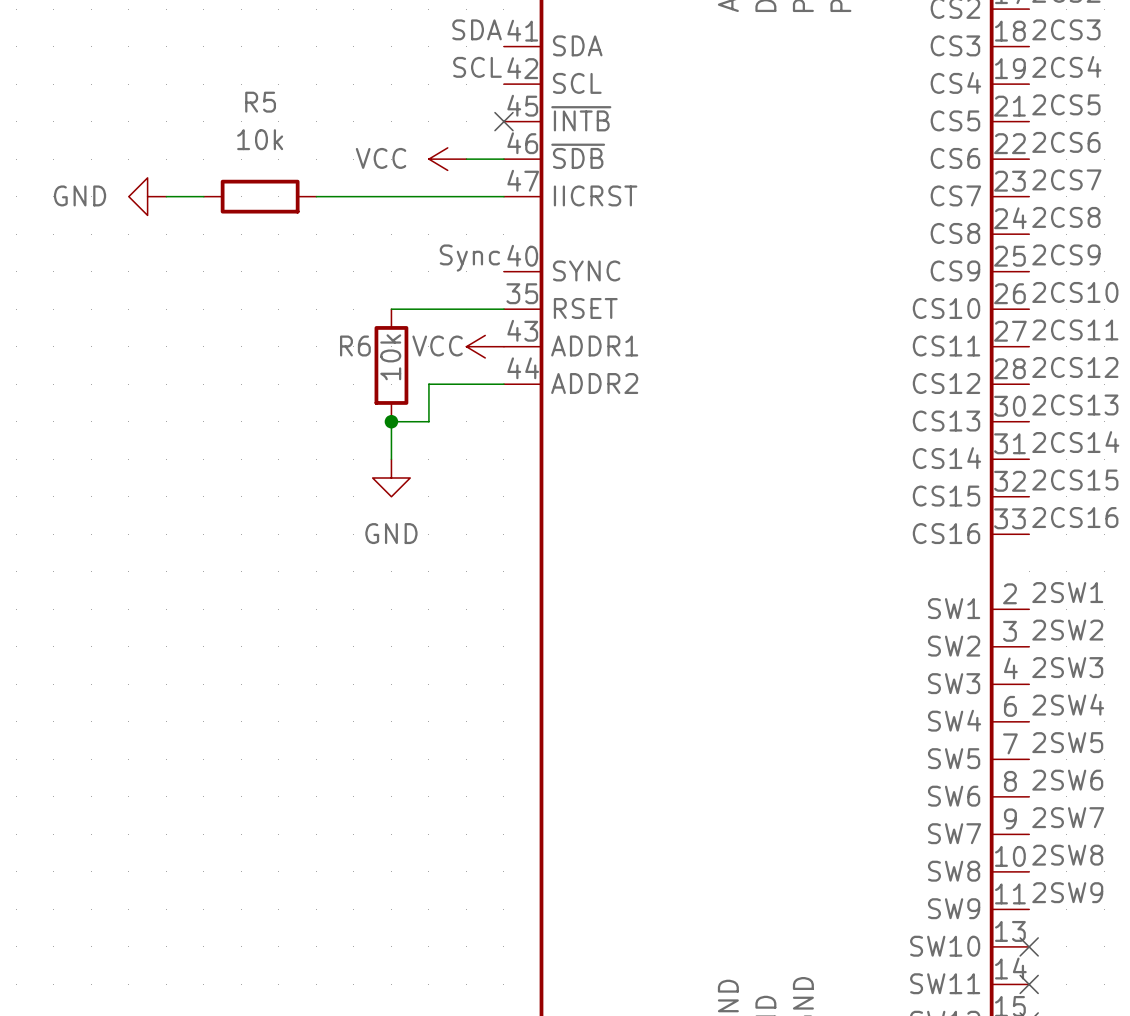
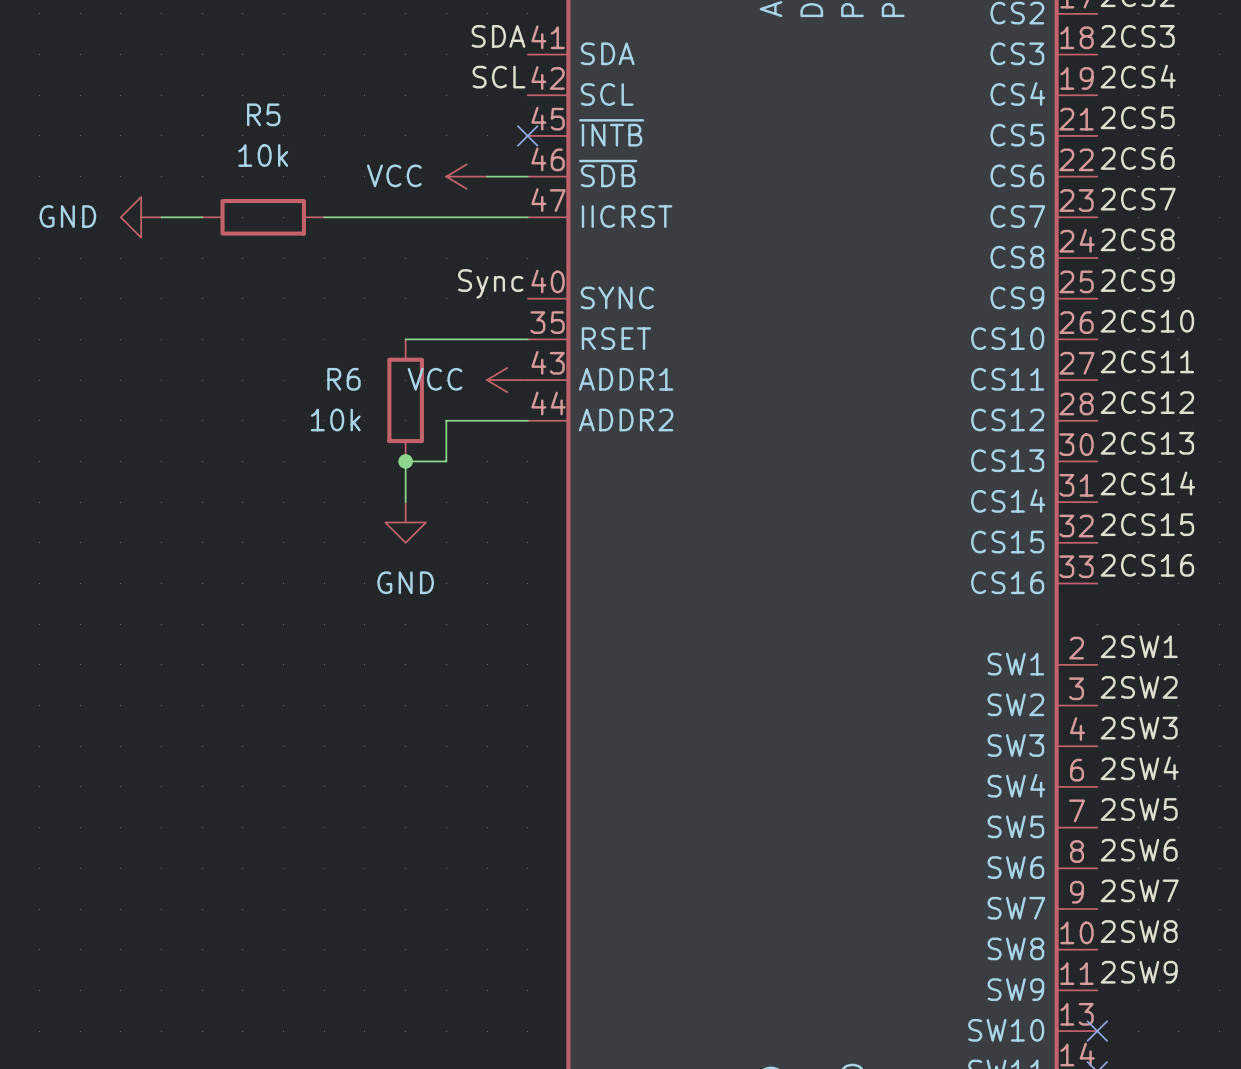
R6 name position: R6 (355, 346) -> R6 (343, 379)
power symbol text position: VCC (437, 346) -> VCC (435, 379)
R6 value rotation: 0° (390, 357) -> 90° clockwise (335, 419)
R6 value position: 10k (390, 357) -> 10k (335, 419)

